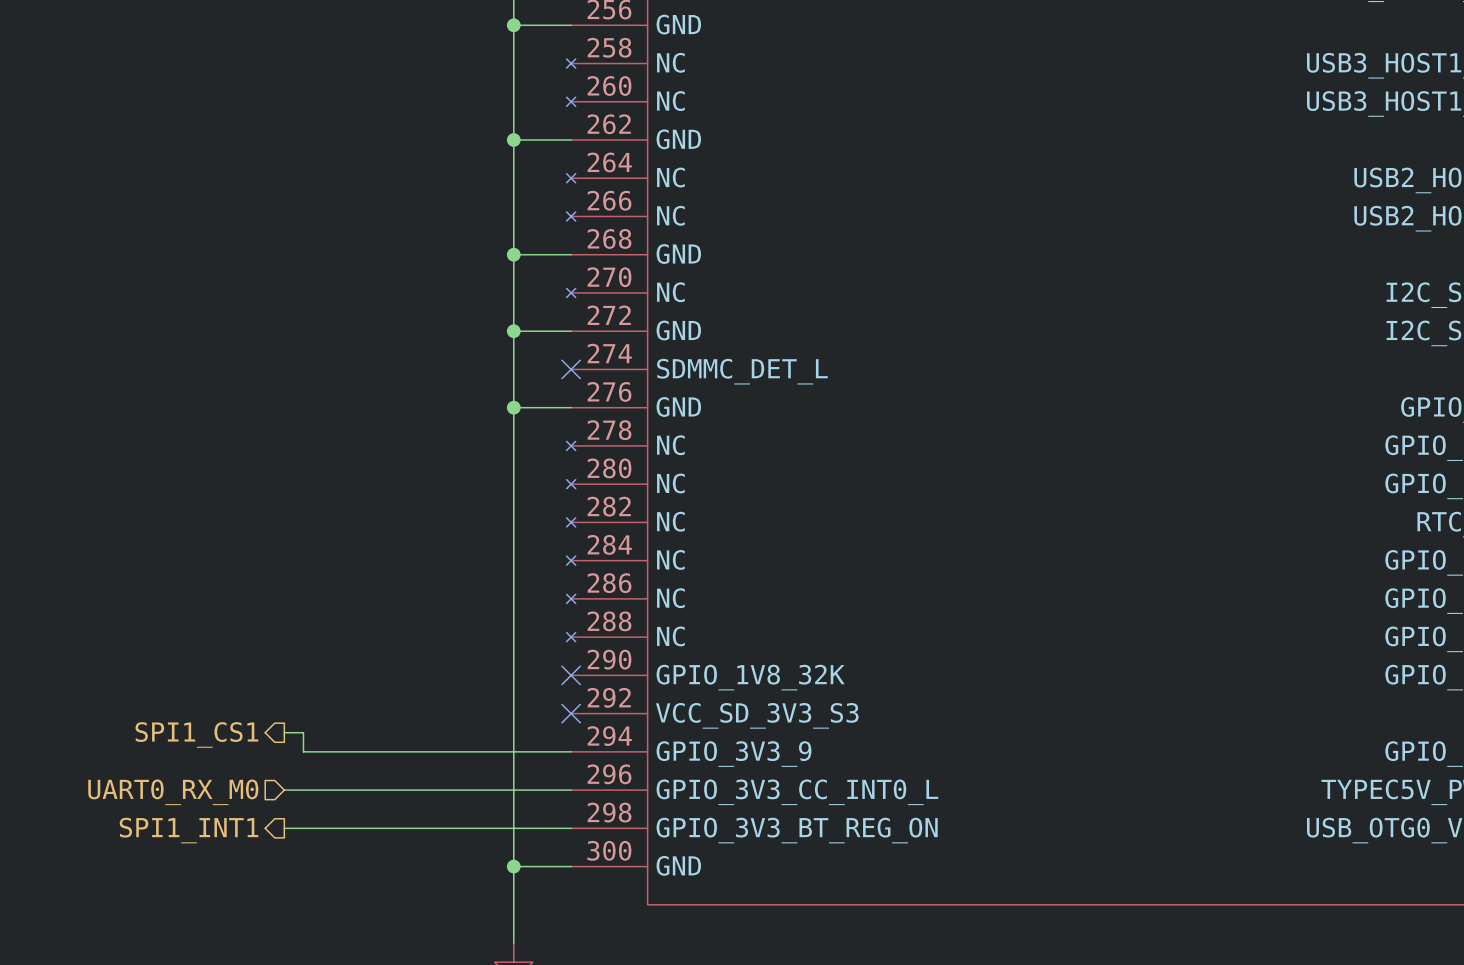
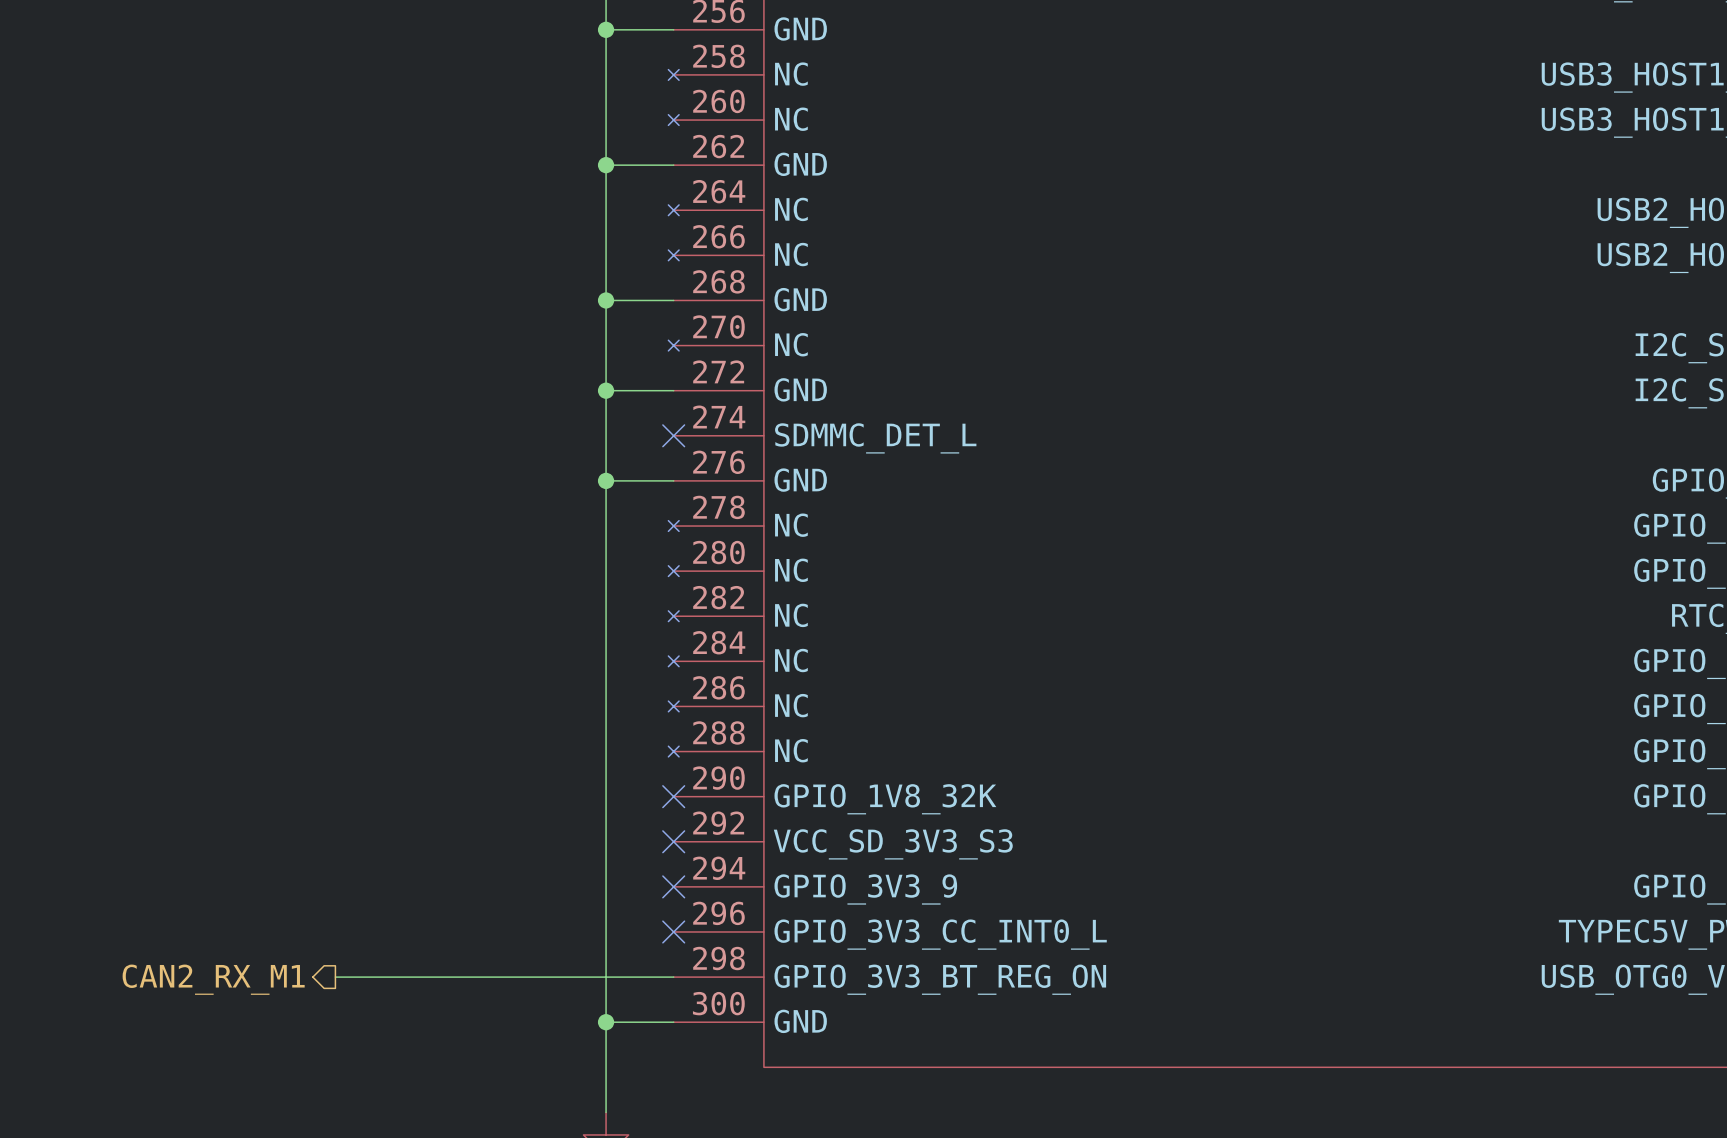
wire: (284, 732) (303, 732) (303, 751) (571, 751) -> none
hierarchical label: SPI1_CS1 (196, 734) -> none
no-connect mark: none -> (673, 886)
wire: (284, 790) (571, 790) -> none
no-connect mark: none -> (673, 931)
hierarchical label: UART0_RX_M0 (173, 792) -> none
hierarchical label: SPI1_INT1 (189, 830) -> CAN2_RX_M1 (213, 979)

